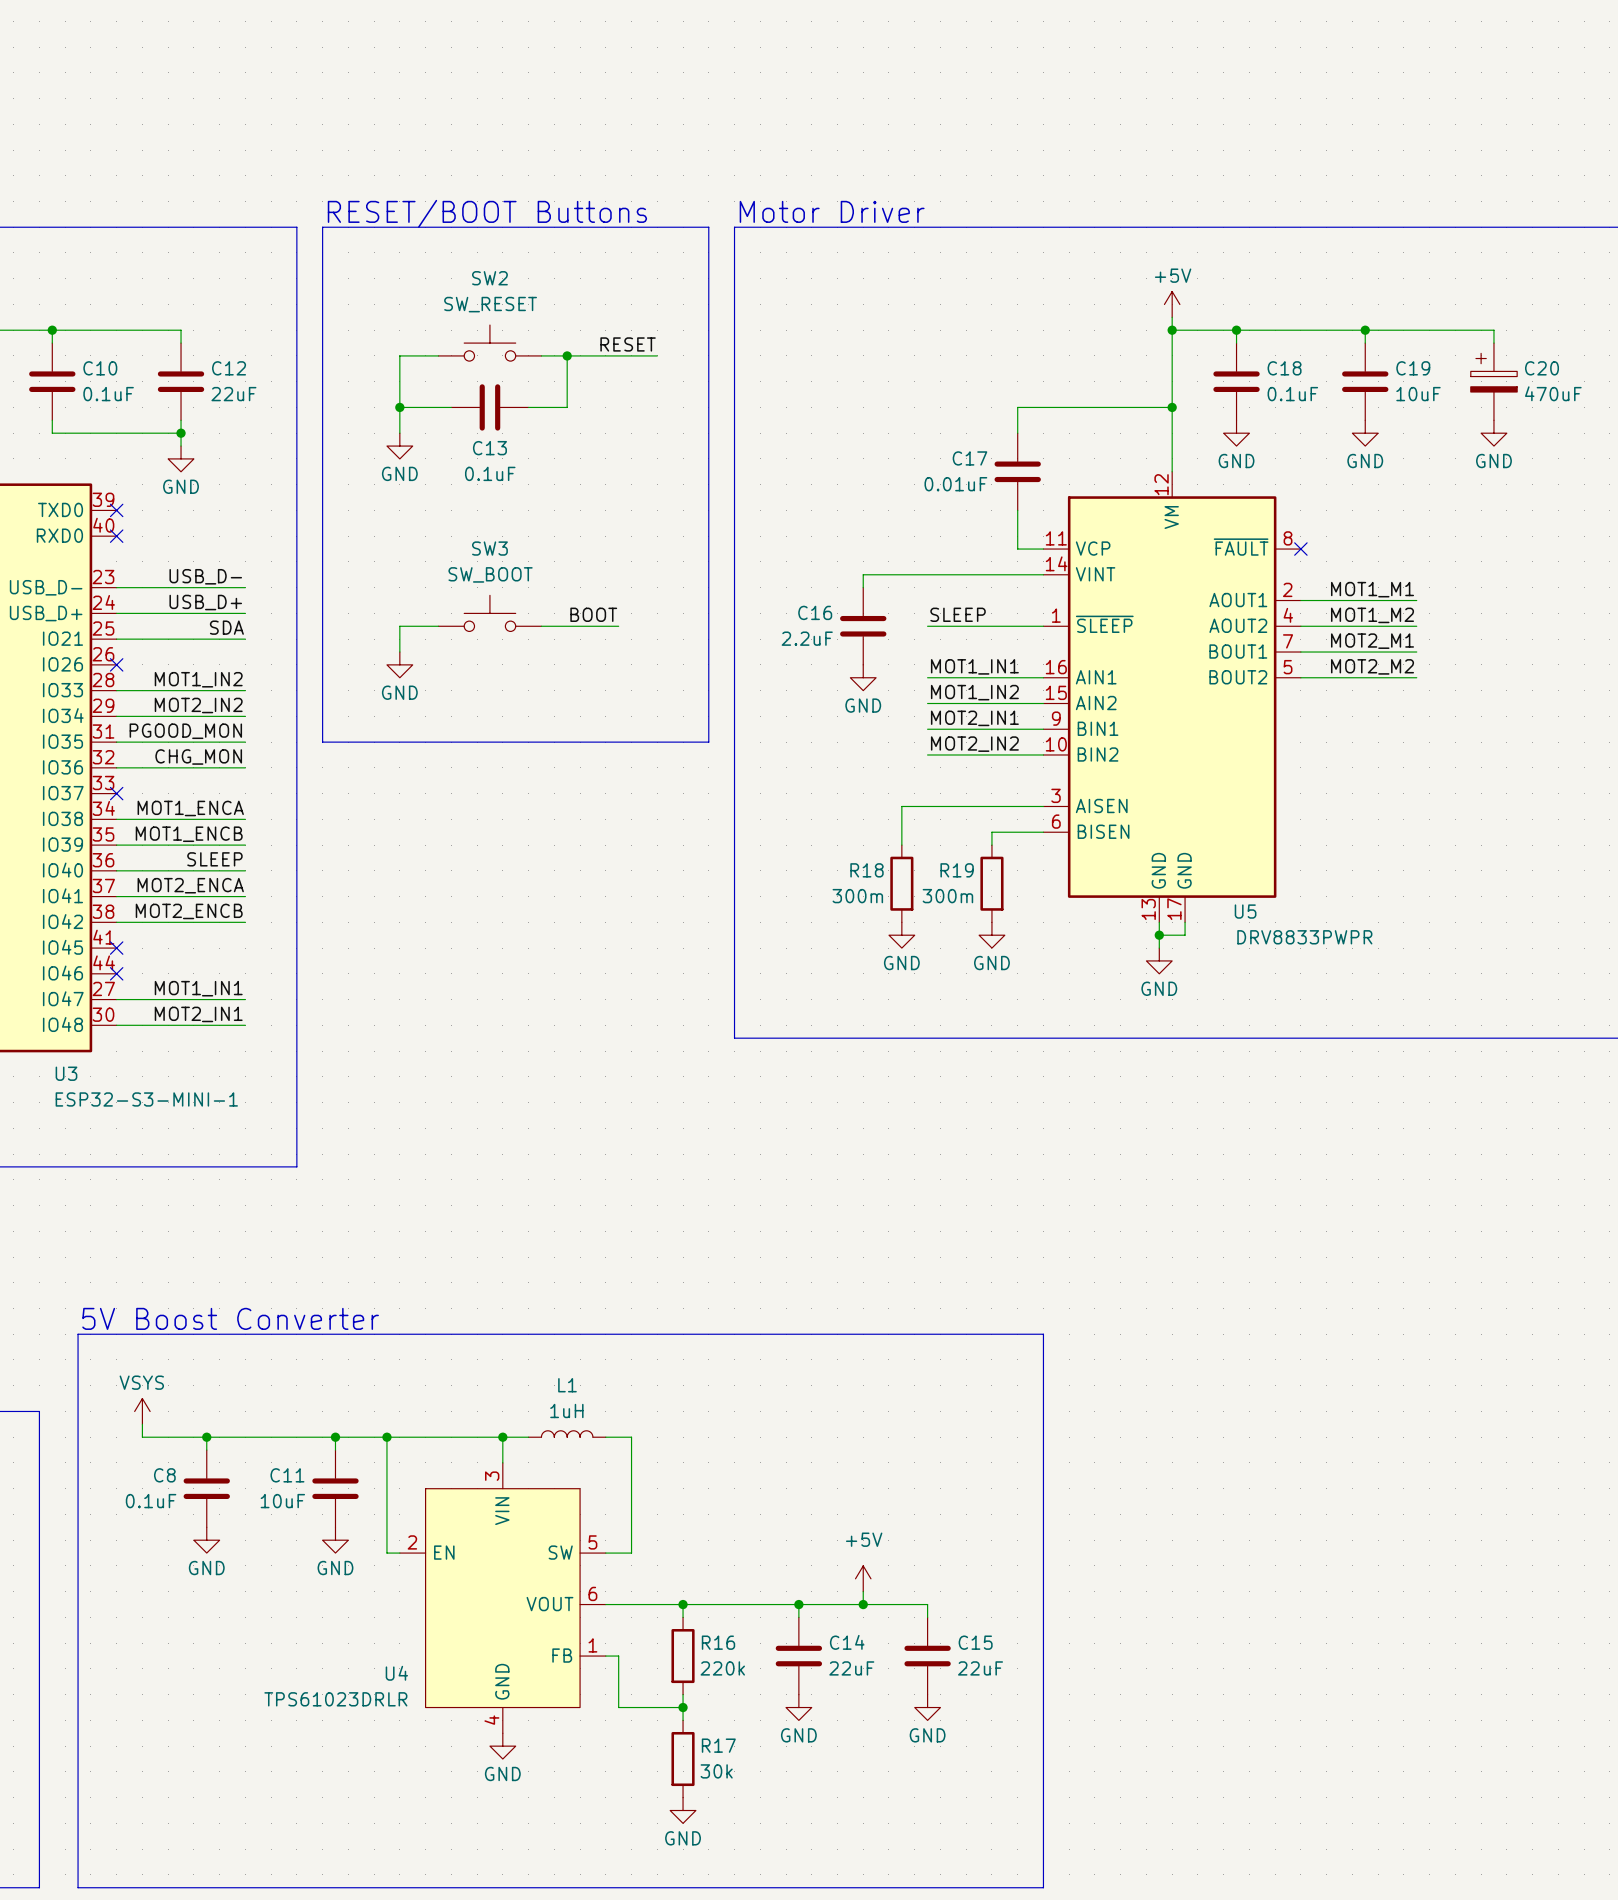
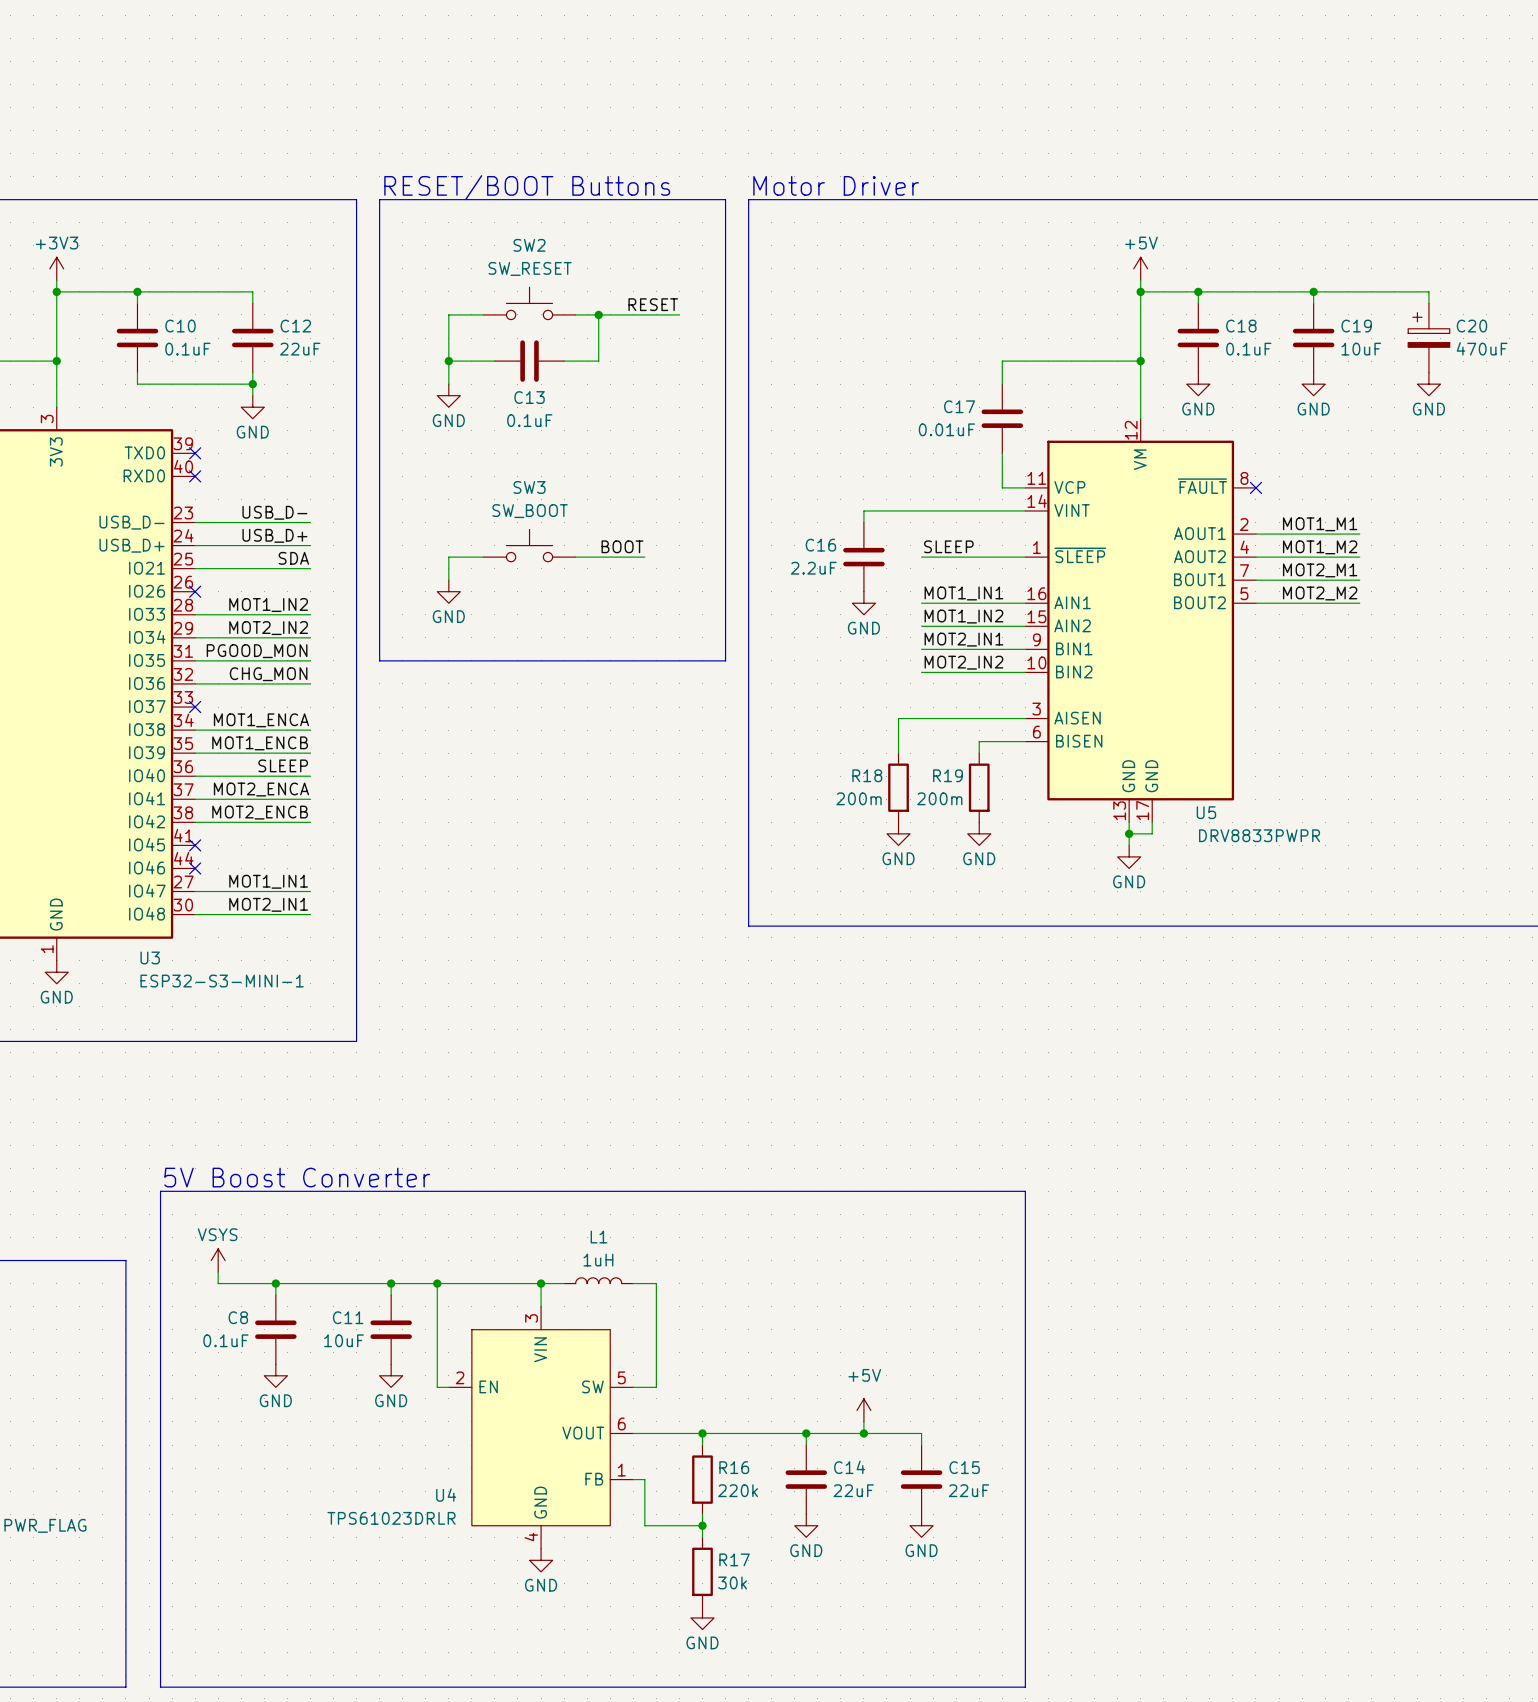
R18 value: 300m (857, 896) -> 200m (859, 798)
R19 value: 300m (947, 896) -> 200m (939, 798)

